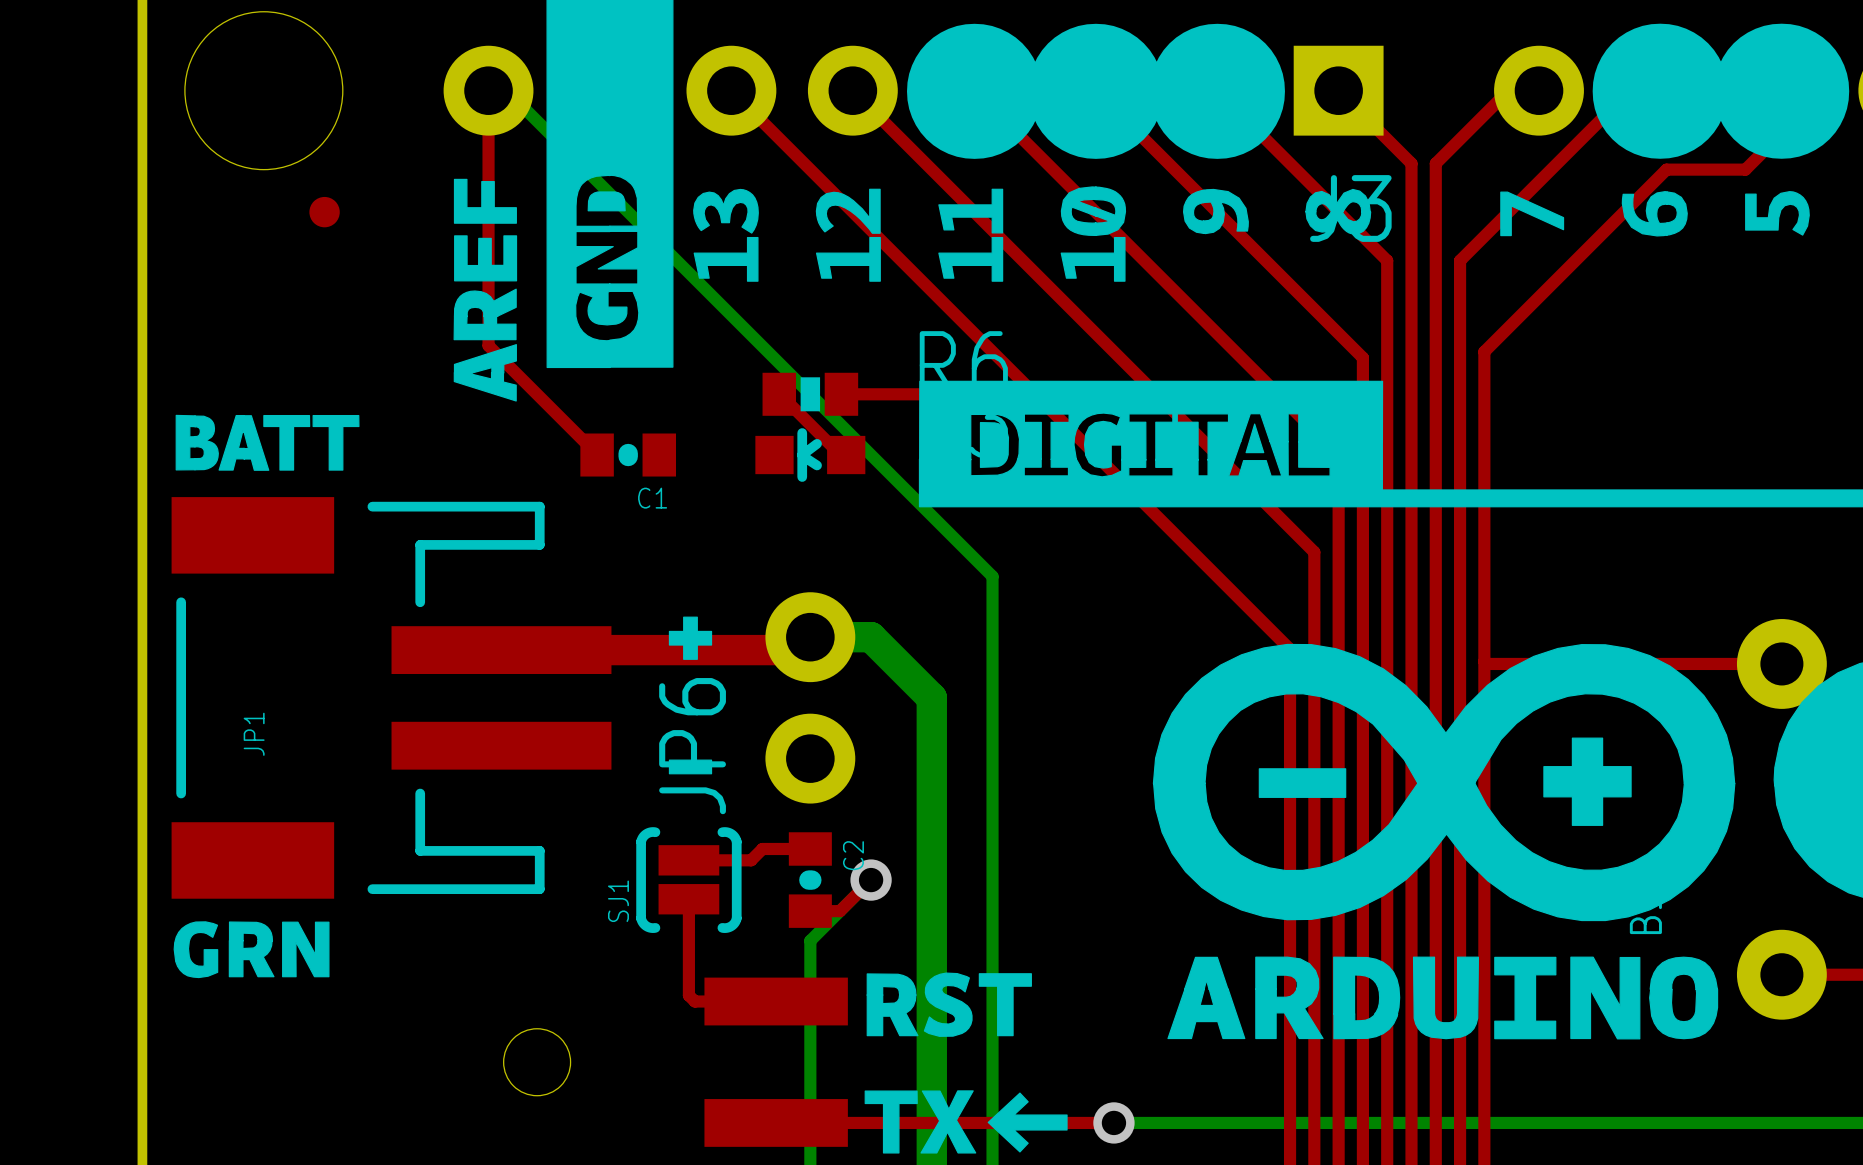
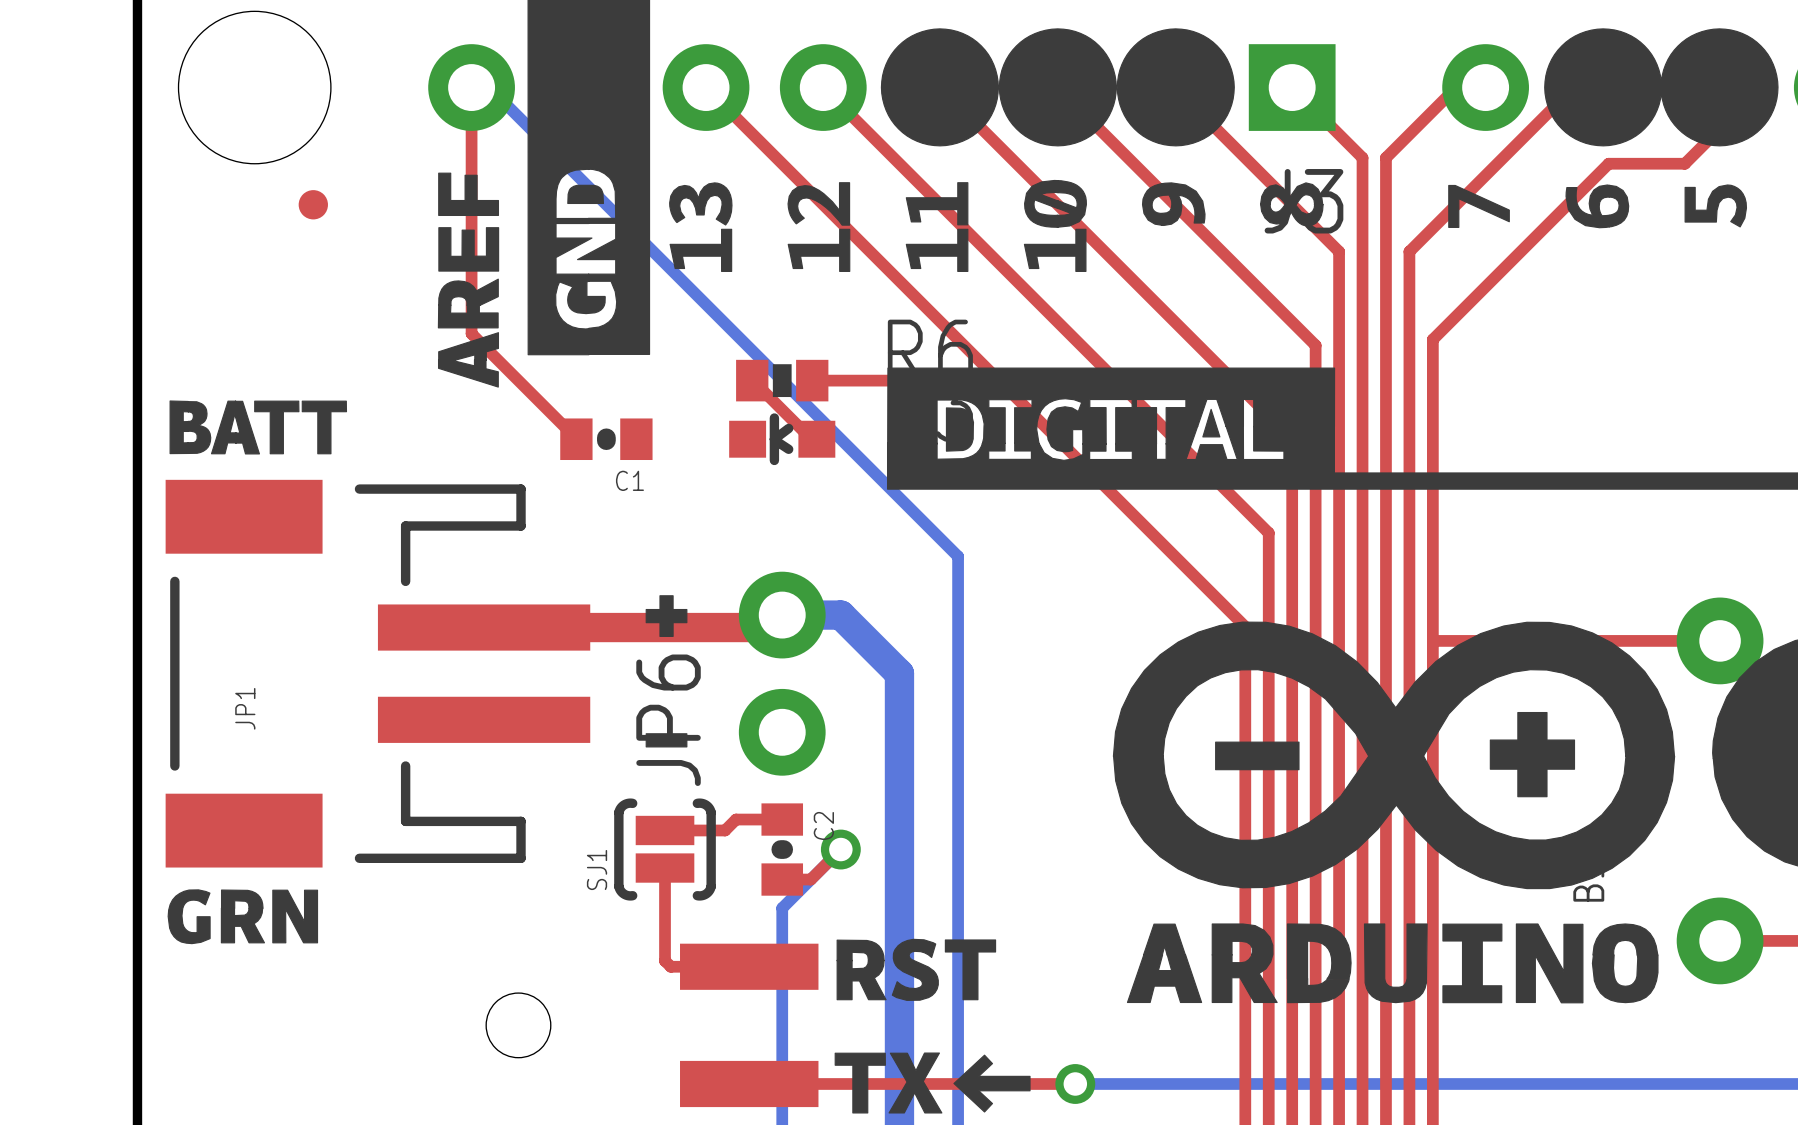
drawing shape: [907, 23, 1043, 159] -> [880, 28, 999, 147]
drawing shape: [1028, 23, 1164, 159] -> [998, 28, 1117, 147]
drawing shape: [1149, 23, 1285, 159] -> [1116, 28, 1235, 147]
drawing shape: [1592, 23, 1728, 159] -> [1544, 28, 1663, 147]
drawing shape: [1714, 23, 1850, 159] -> [1660, 28, 1779, 147]

